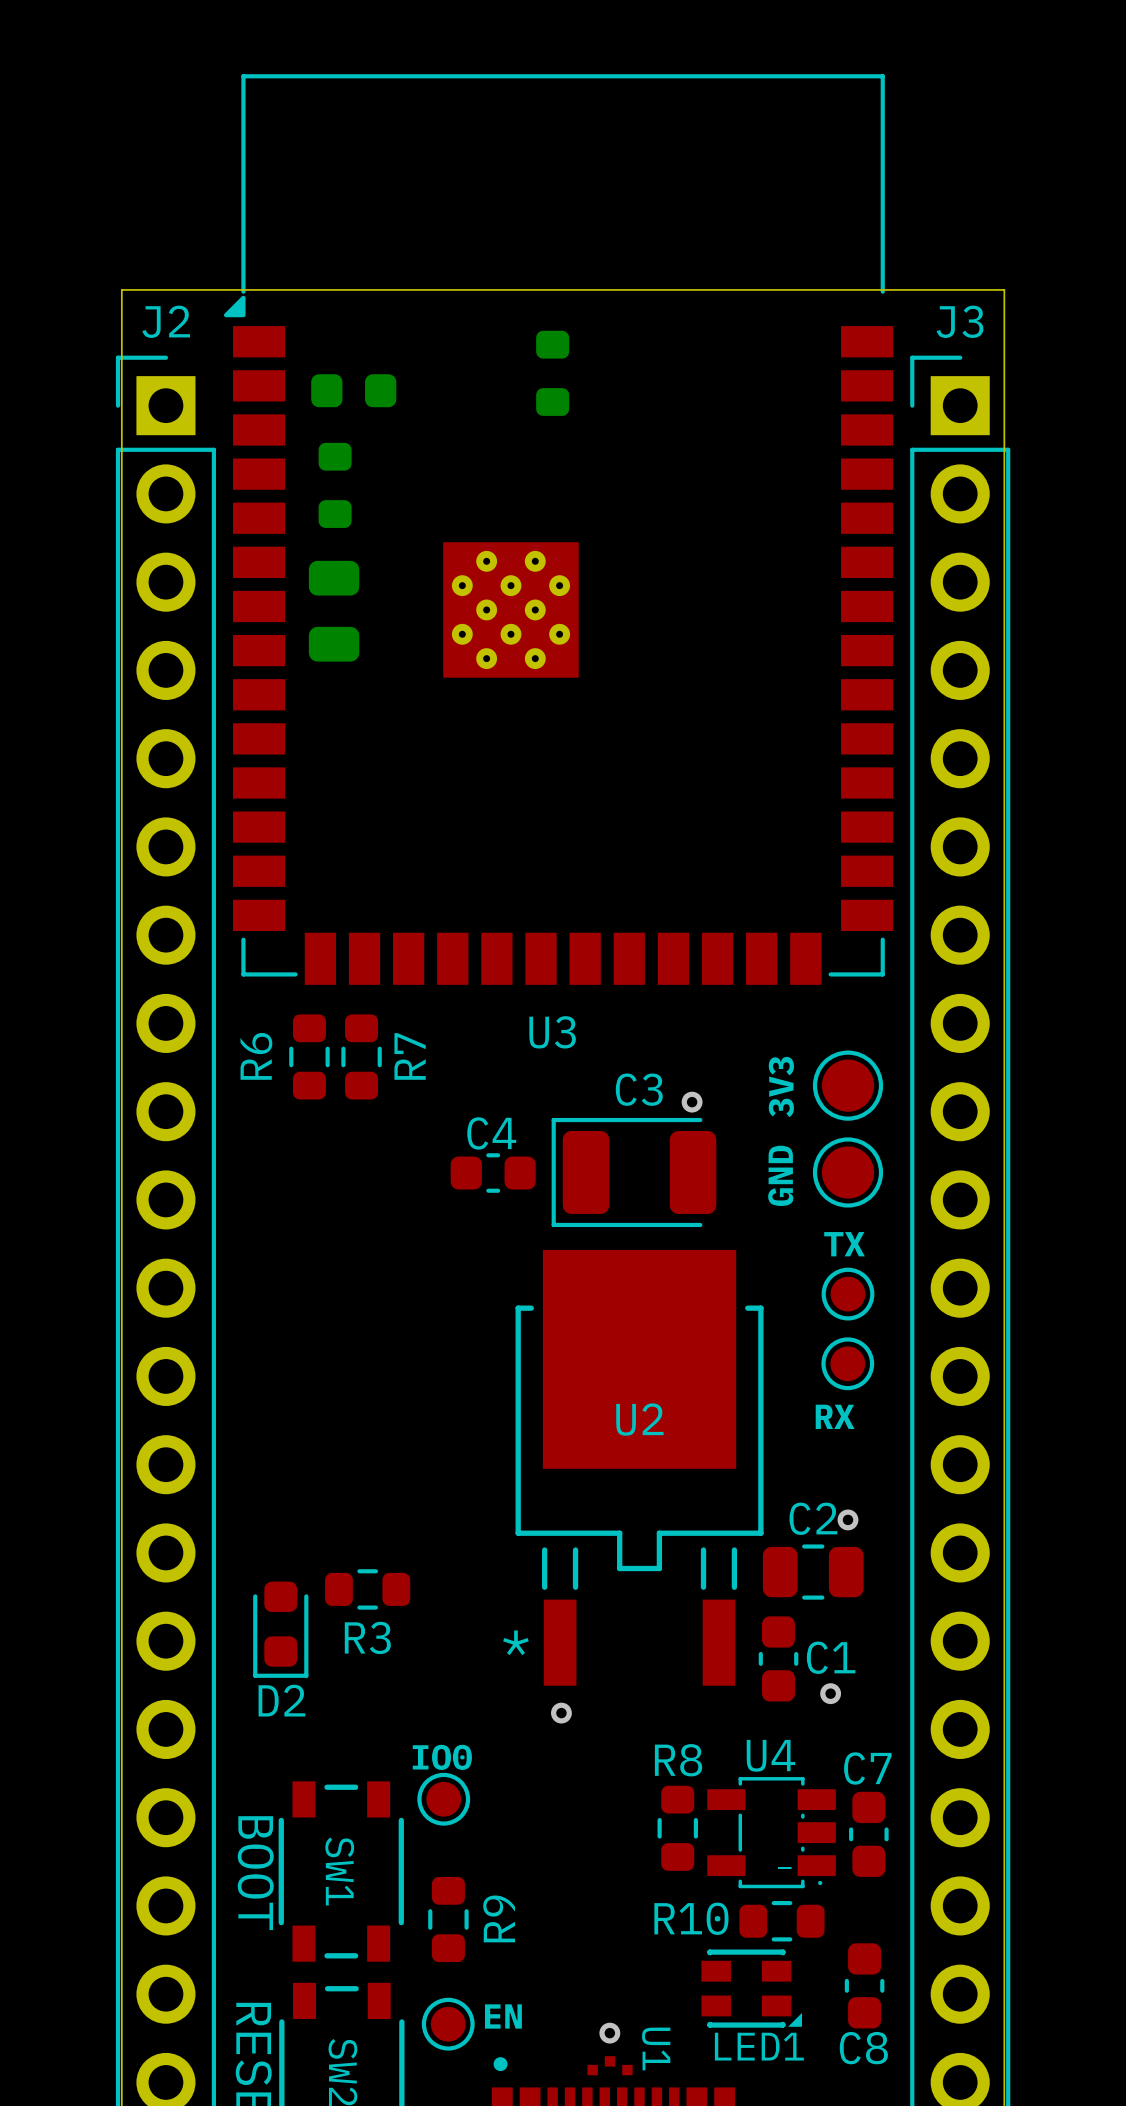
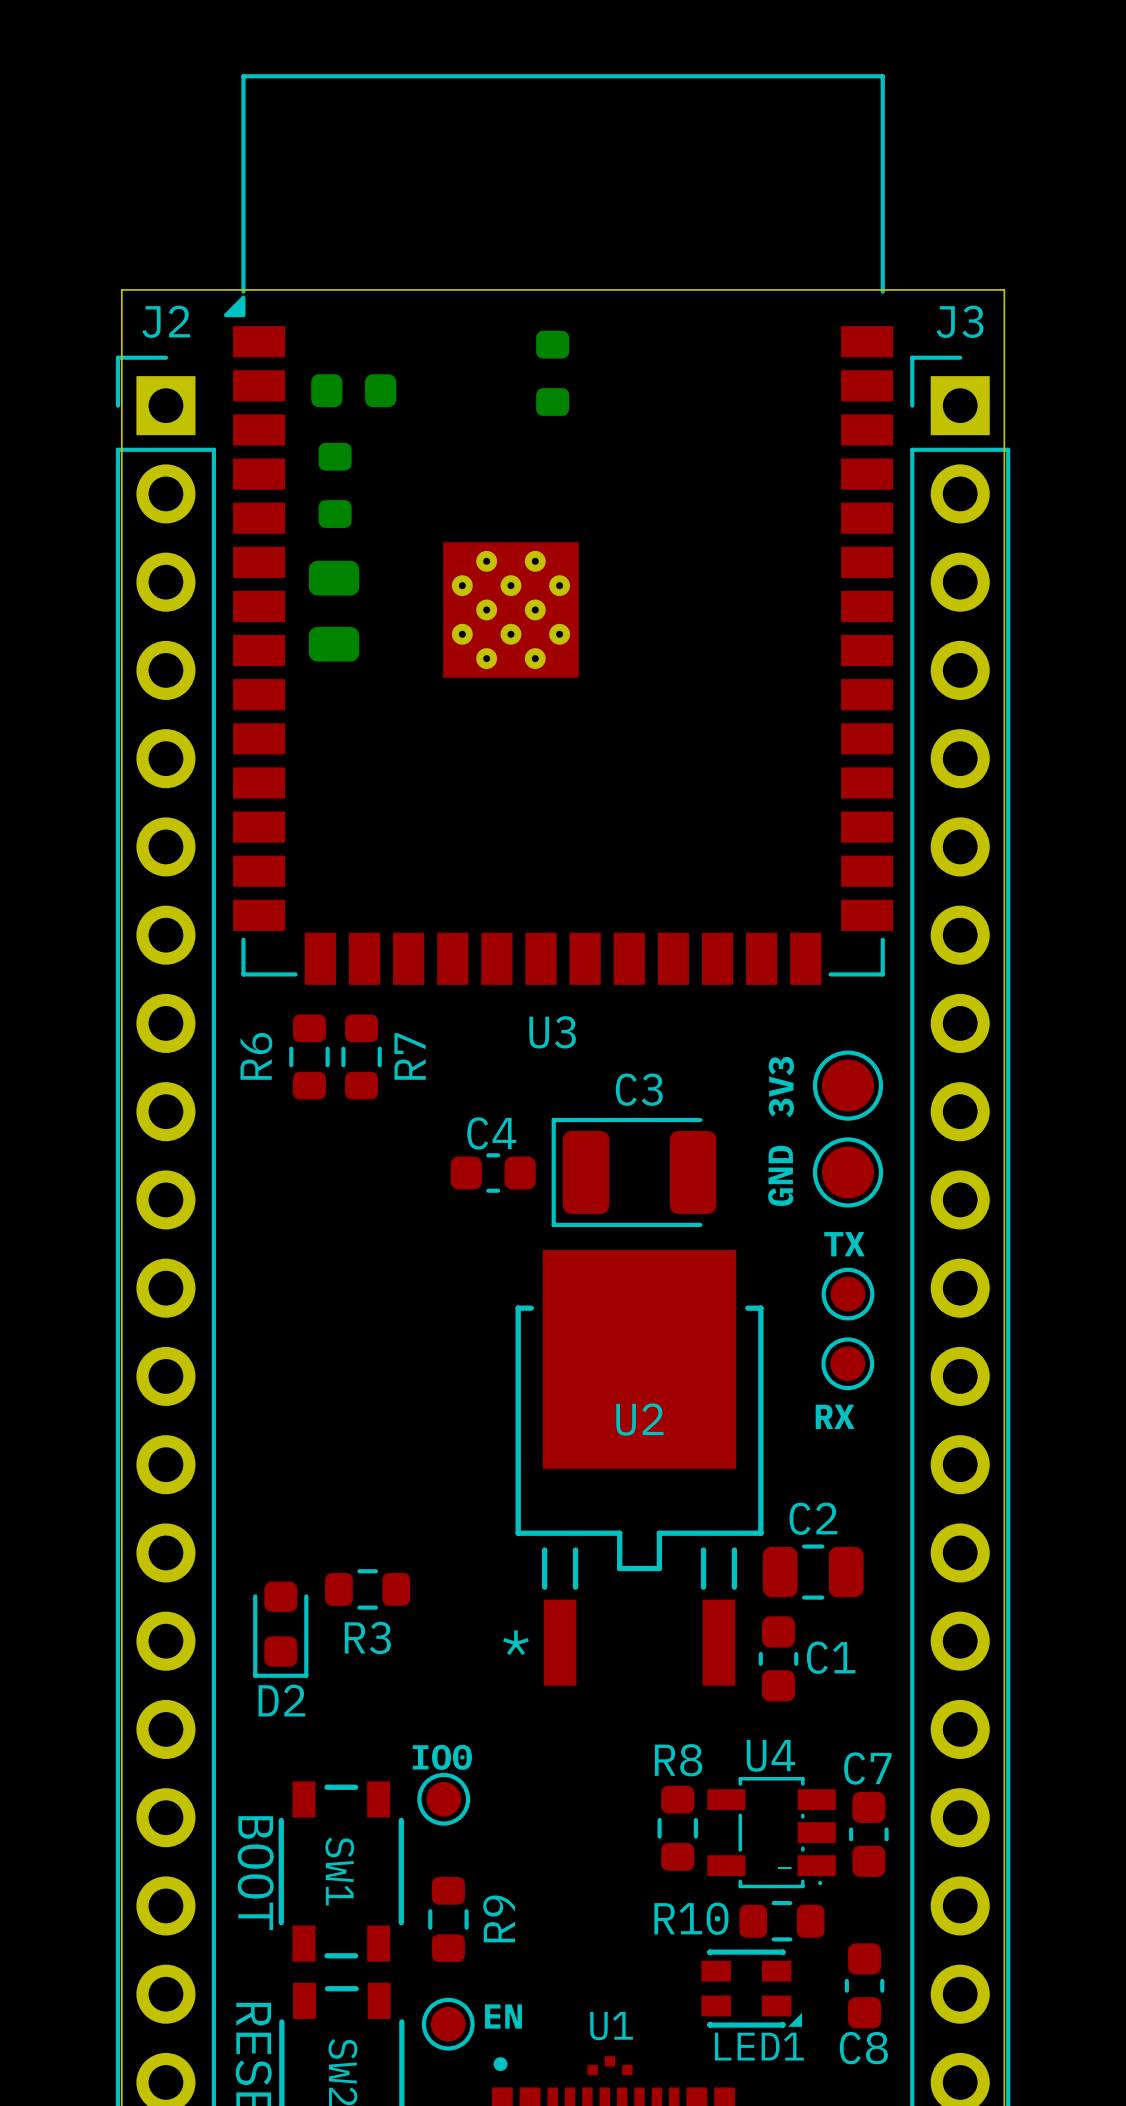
via: (692, 1102) -> none
via: (847, 1519) -> none
via: (830, 1693) -> none
via: (561, 1713) -> none
via: (609, 2033) -> none
part text rotation: 0° (656, 2048) -> 90° counterclockwise (611, 2026)

